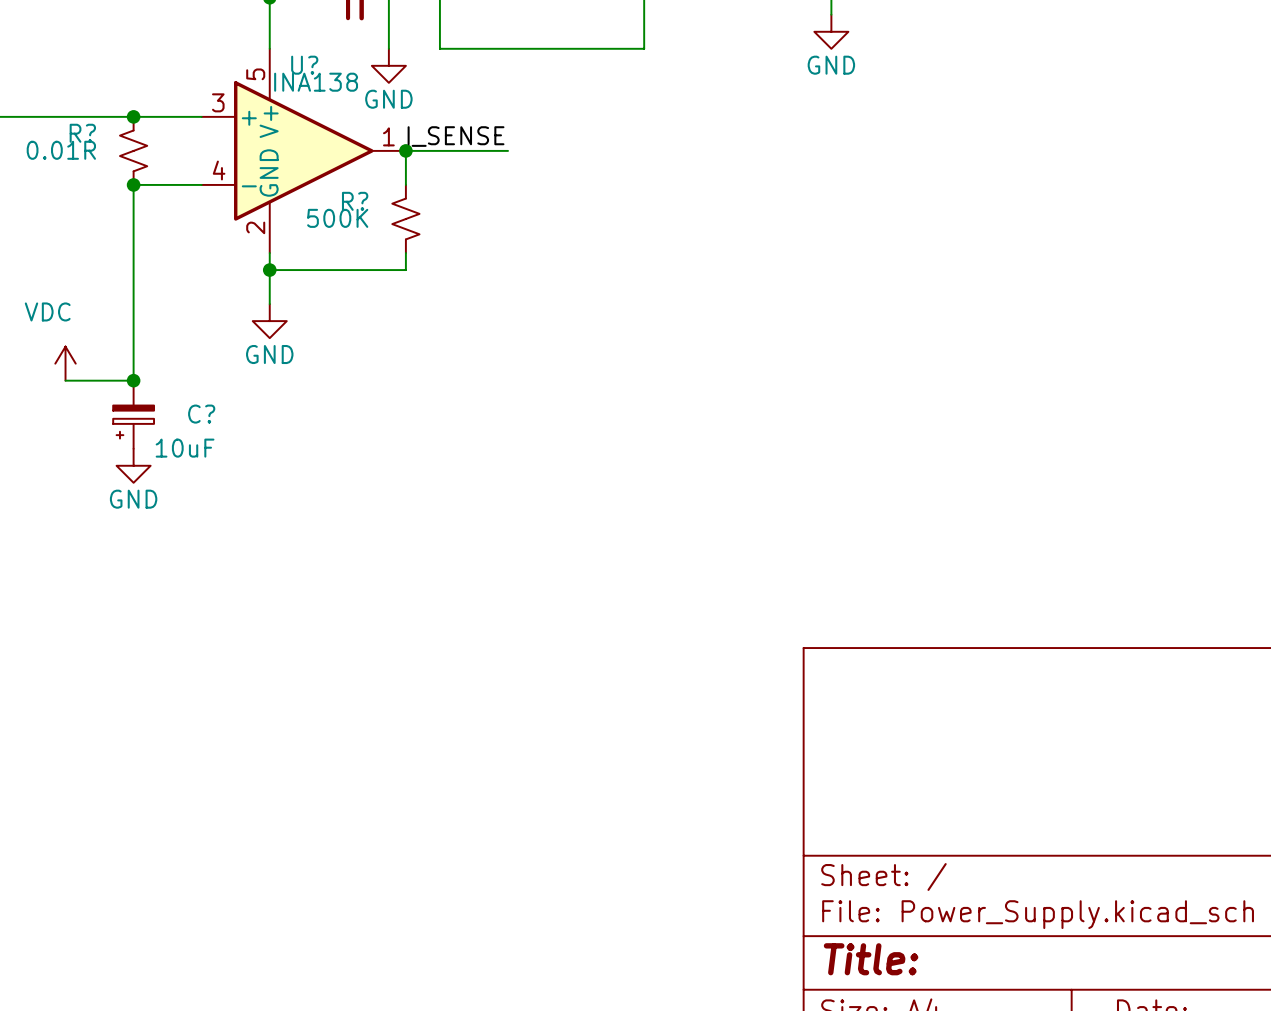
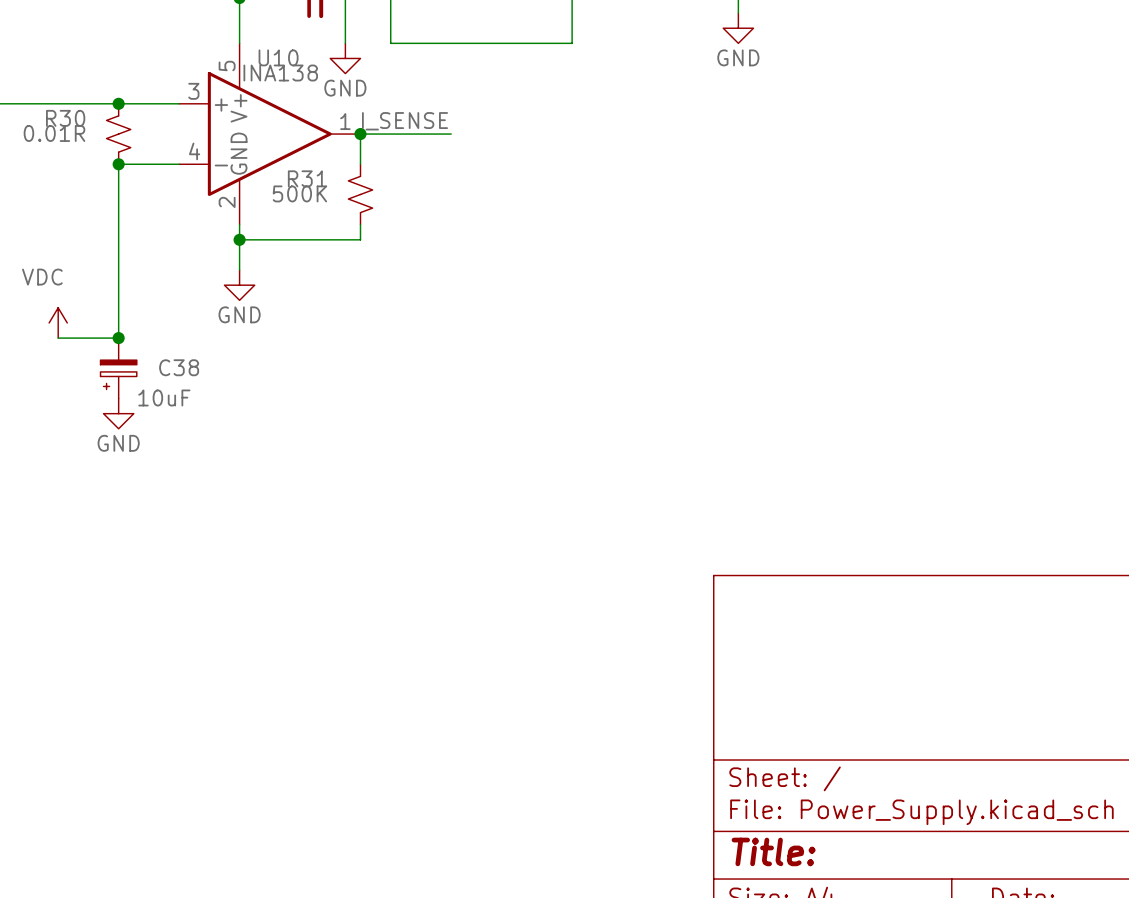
U? name: U? (304, 65) -> U10 (278, 57)
R? name: R? (82, 133) -> R30 (65, 118)
R? name: R? (355, 201) -> R31 (307, 178)
C? name: C? (201, 414) -> C38 (179, 367)

